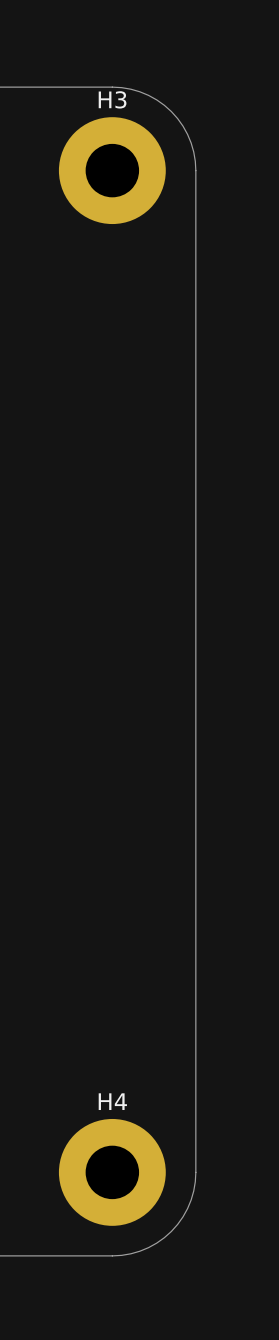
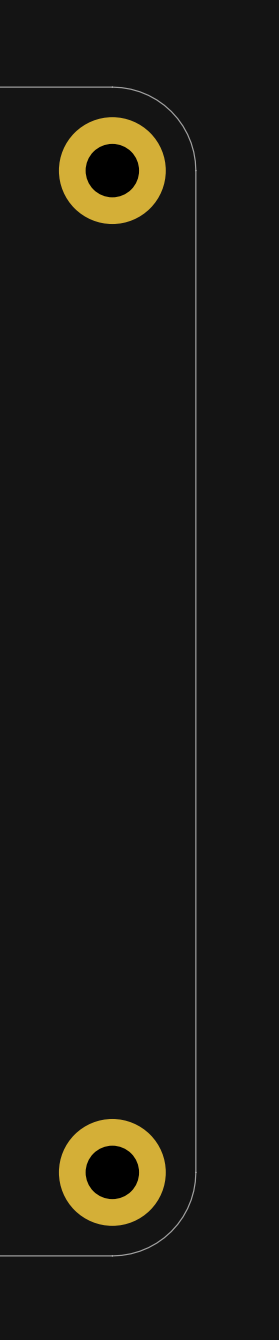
H3 name: H3 (112, 99) -> none
H4 name: H4 (112, 1101) -> none

